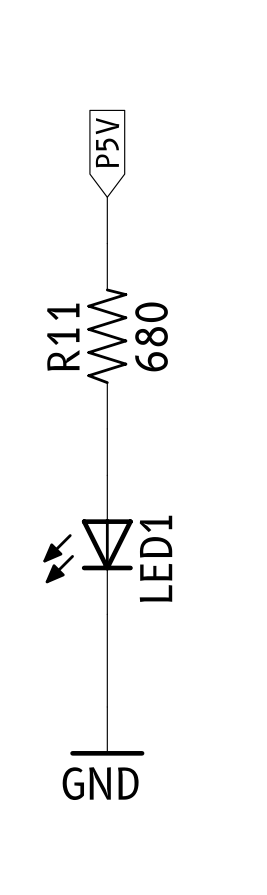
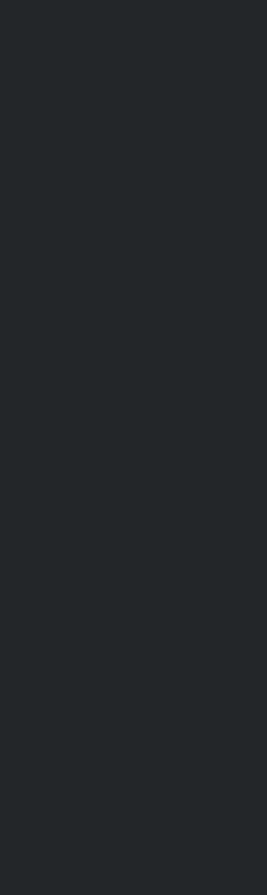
global label: P5V (107, 142) -> none
wire: (107, 197) (107, 243) -> none
R11: 680 (107, 336) -> none
wire: (107, 428) (107, 475) -> none
LED1: (88, 544) -> none
wire: (107, 614) (107, 706) -> none
power symbol: GND (107, 731) -> none

